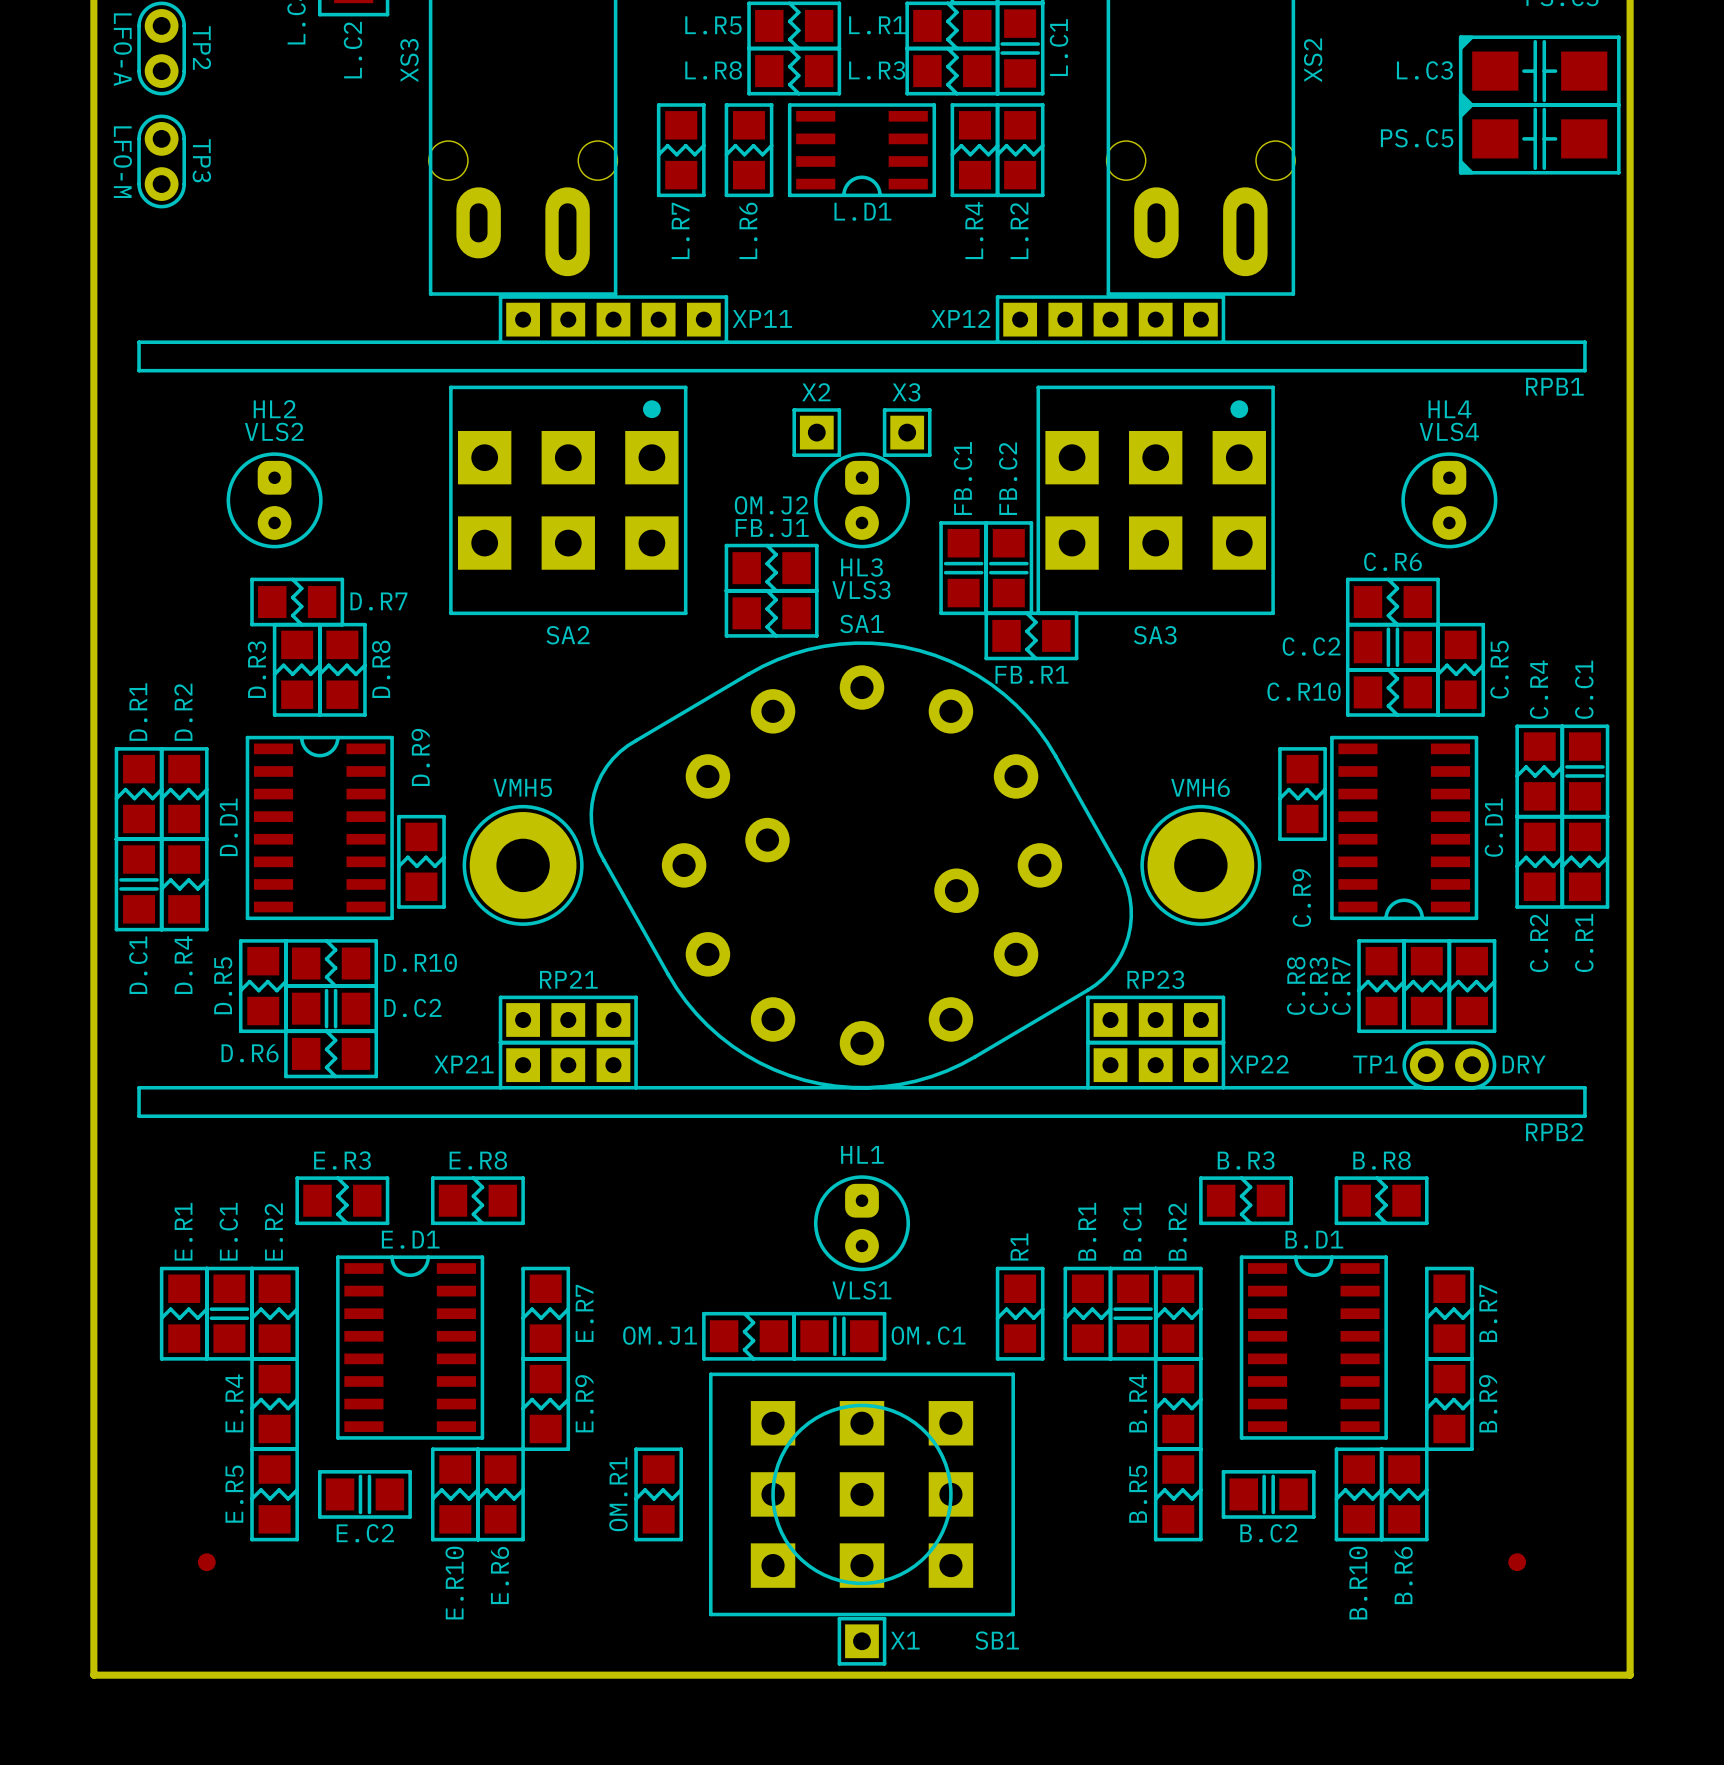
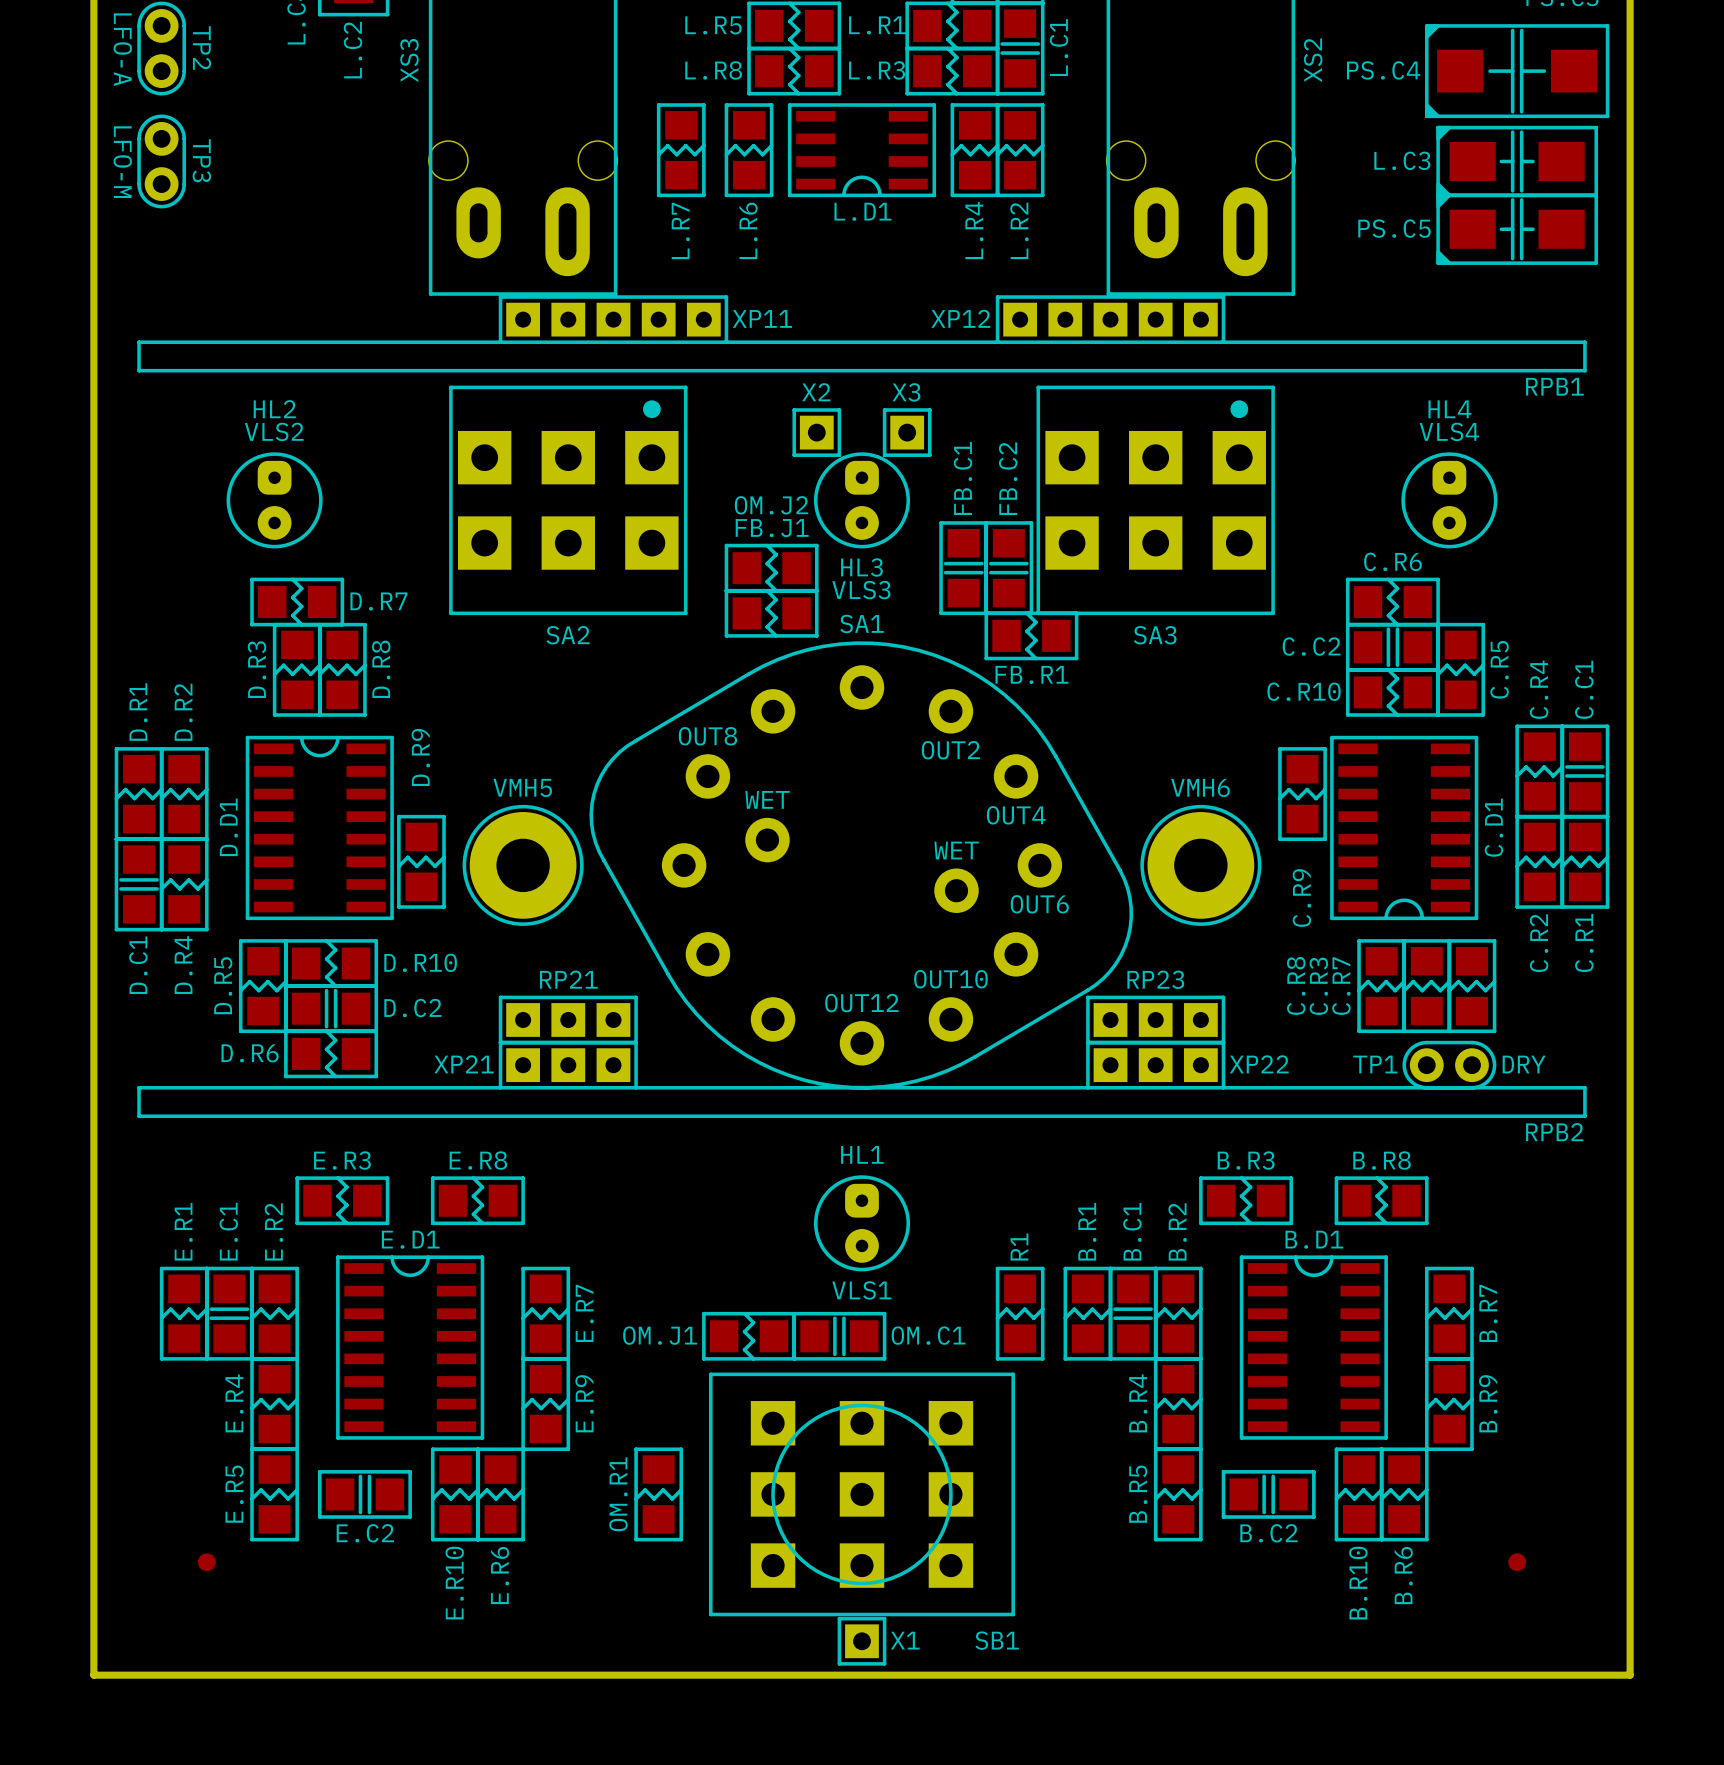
PS.C4: none -> (1517, 71)
L.C3 position: (1539, 71) -> (1517, 161)
PS.C5 position: (1539, 138) -> (1517, 229)
text: none -> OUT8 (707, 736)
text: none -> OUT2 (950, 750)
text: none -> WET (767, 799)
text: none -> OUT4 (1016, 815)
text: none -> WET (956, 850)
text: none -> OUT6 (1039, 904)
text: none -> OUT10 (950, 979)
text: none -> OUT12 (861, 1003)

